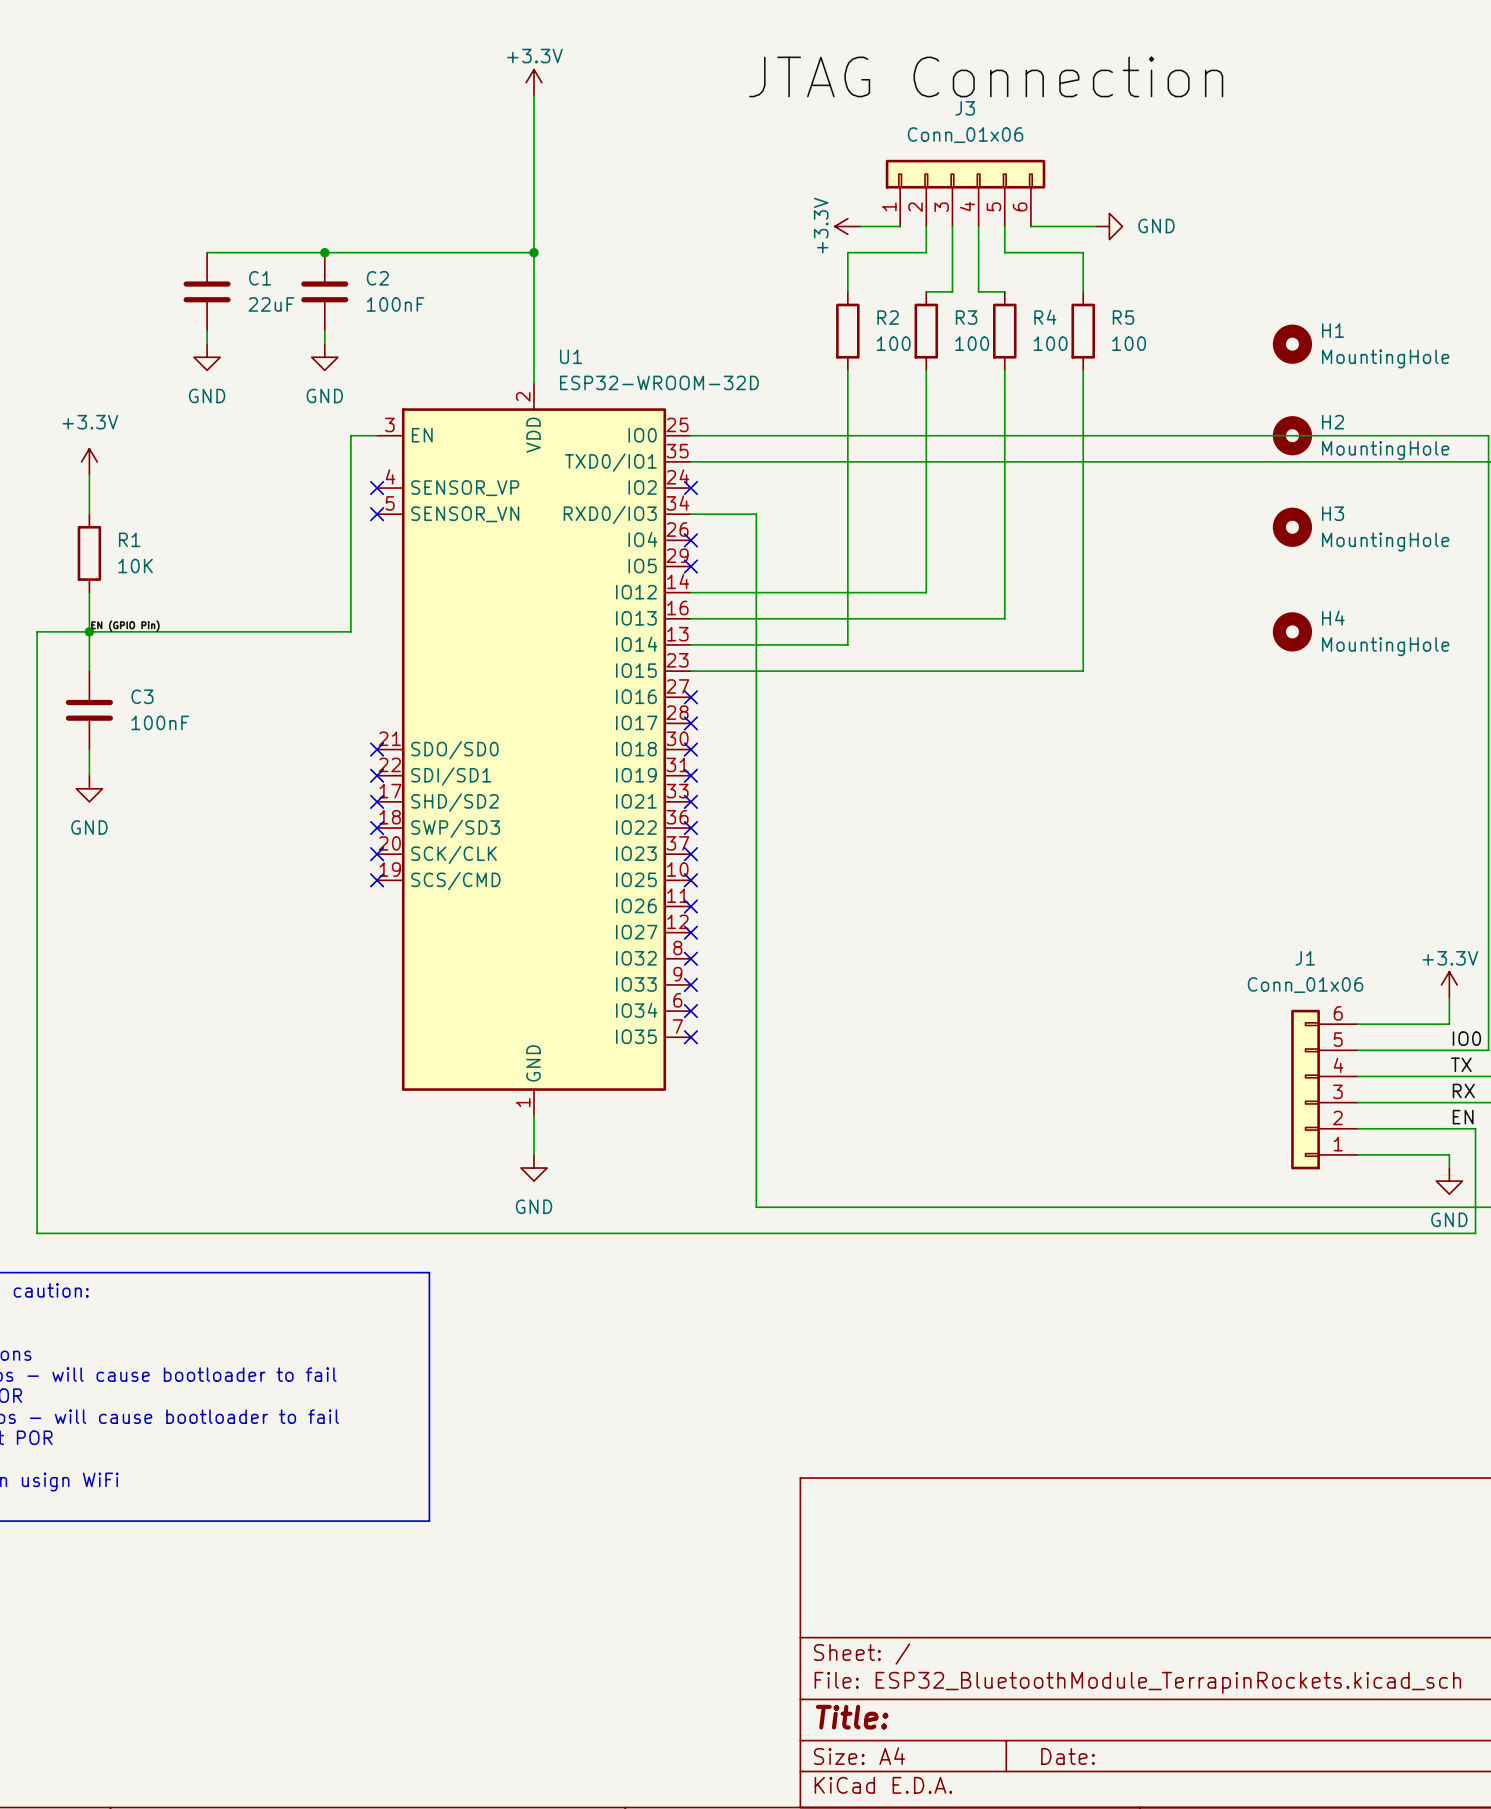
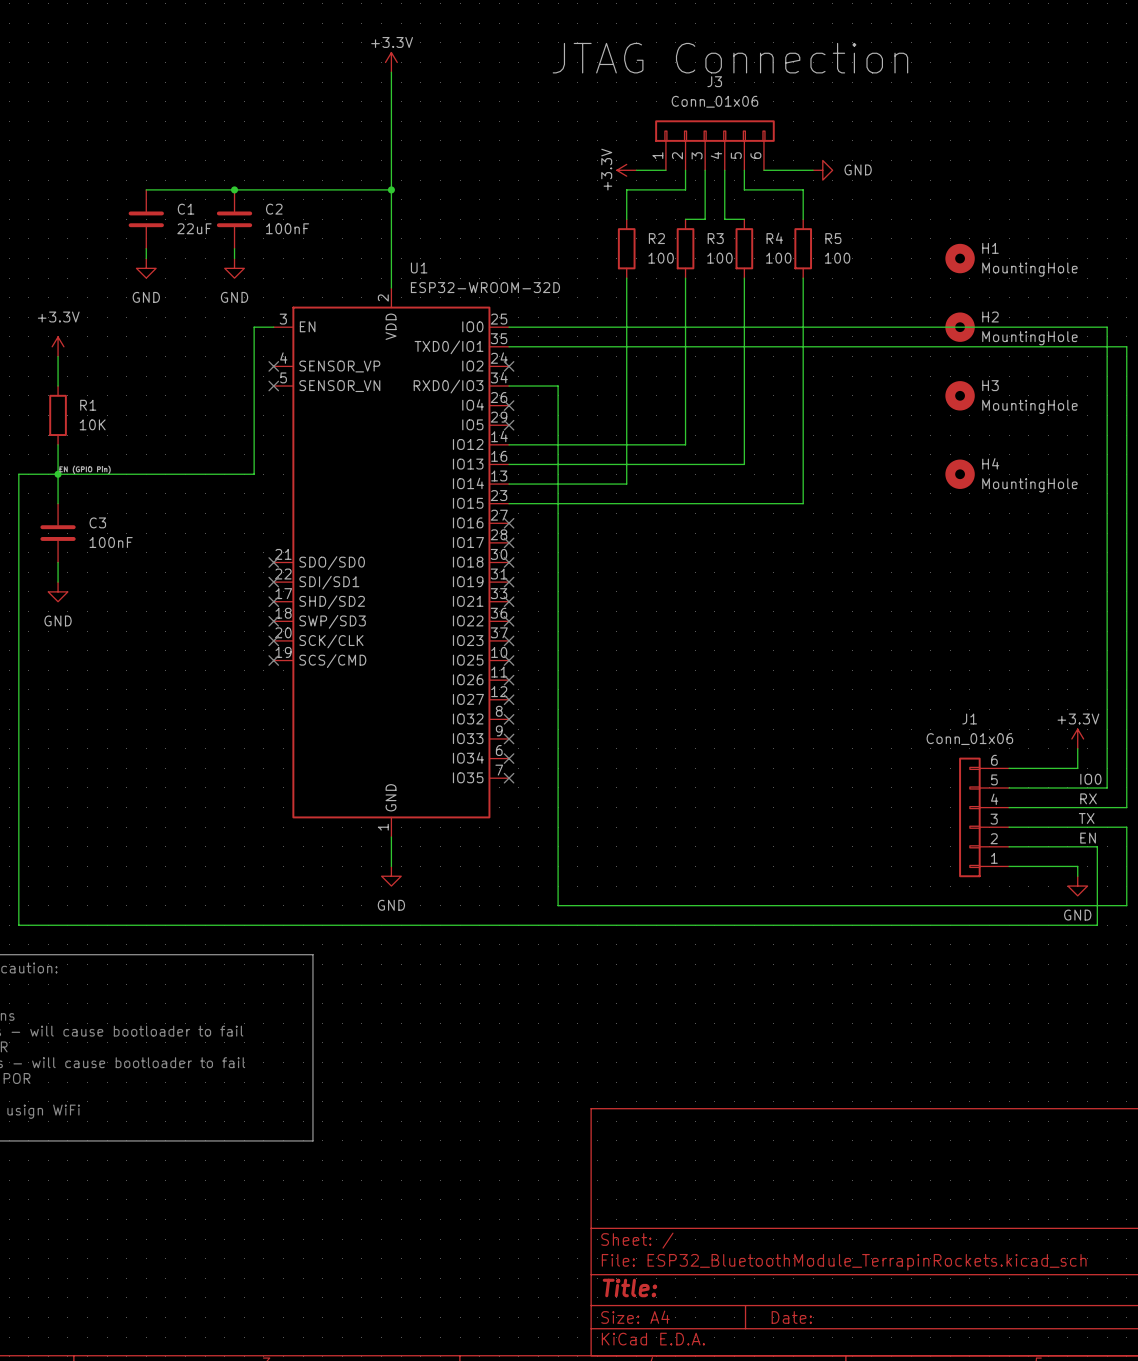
label: TX (1461, 1064) -> RX (1088, 798)
label: RX (1463, 1090) -> TX (1086, 818)

